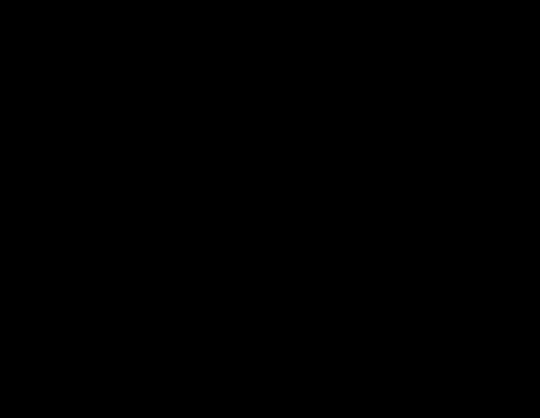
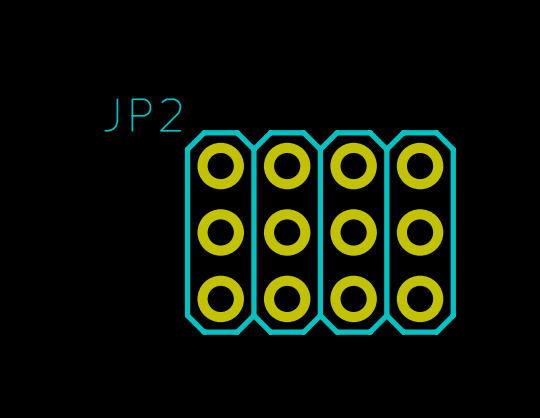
JP2: none -> (320, 232)

